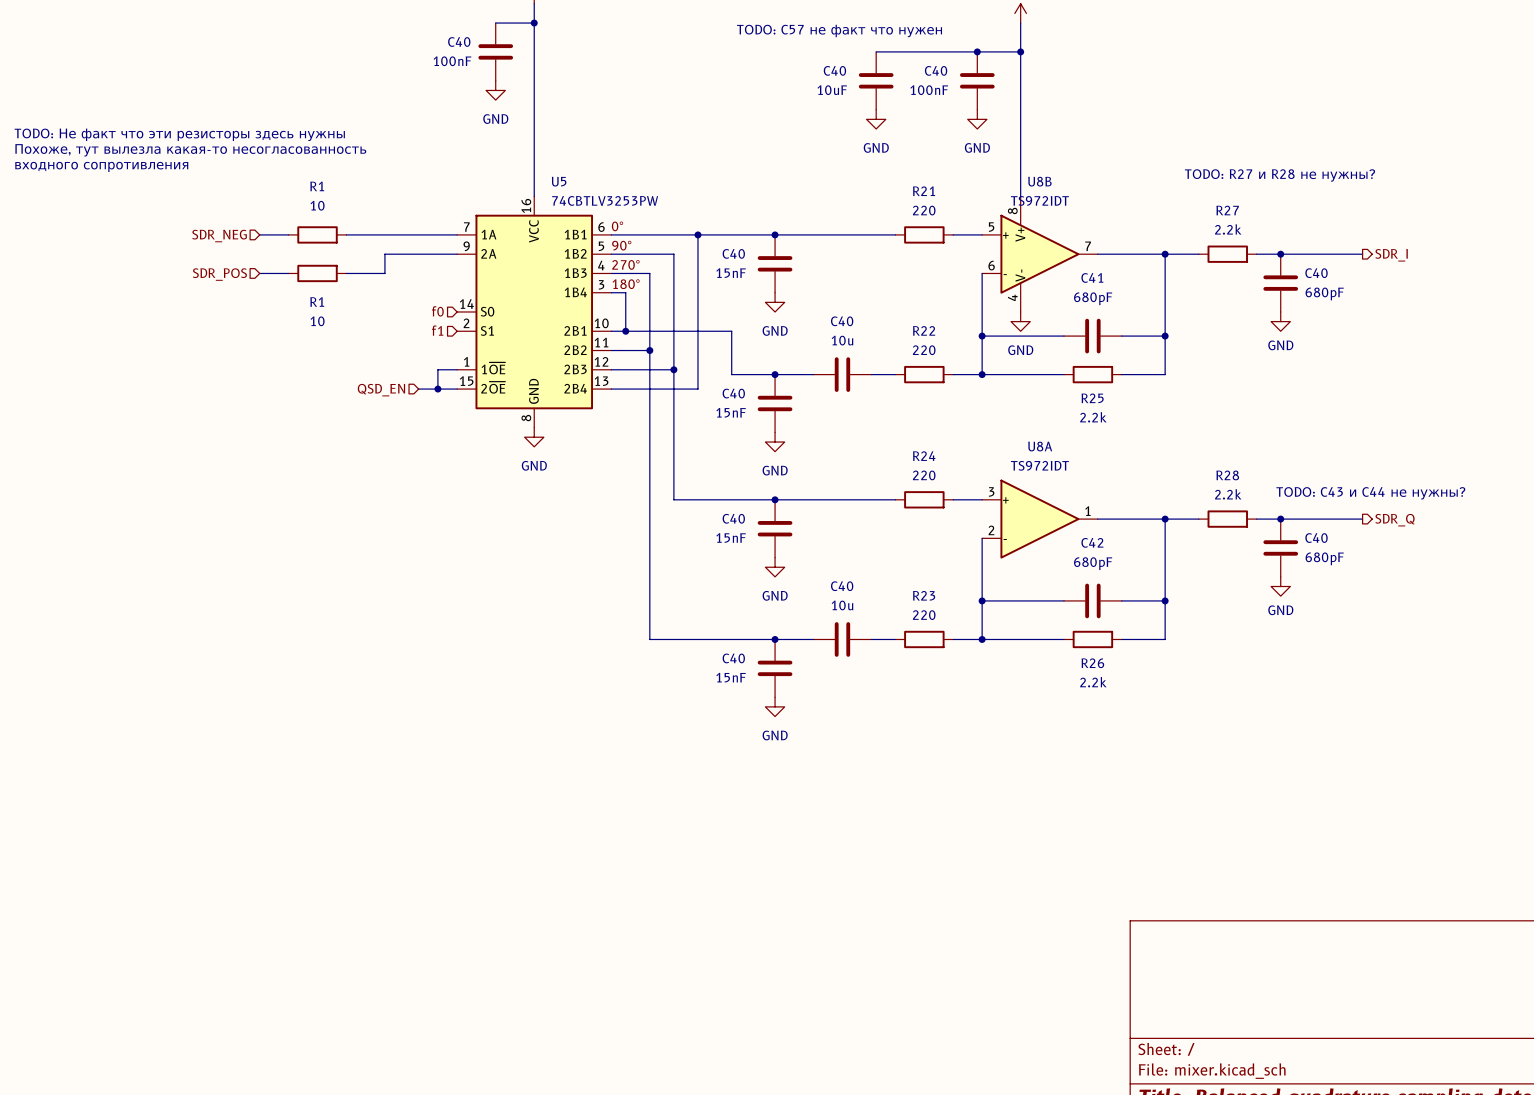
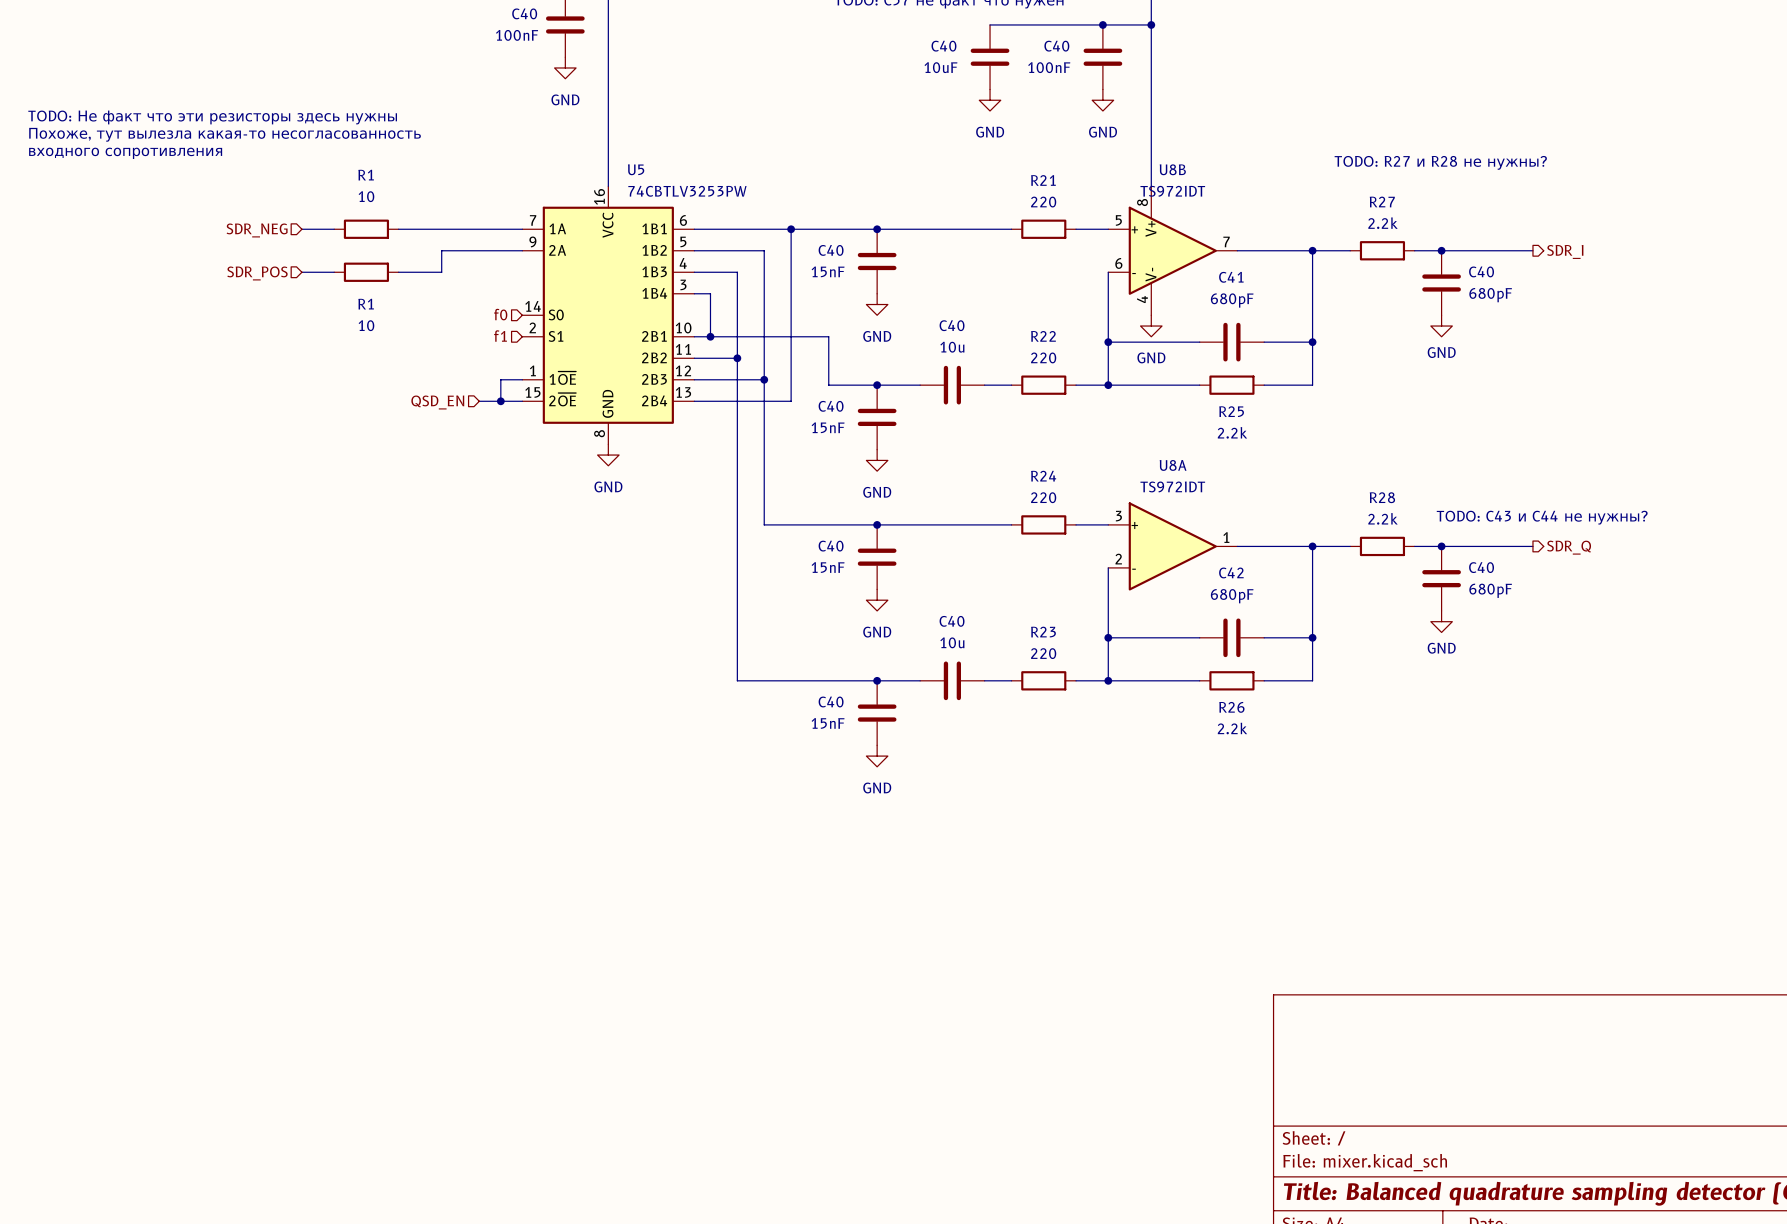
label: 0° (617, 226) -> none
label: 90° (621, 245) -> none
label: 270° (625, 264) -> none
label: 180° (626, 284) -> none

